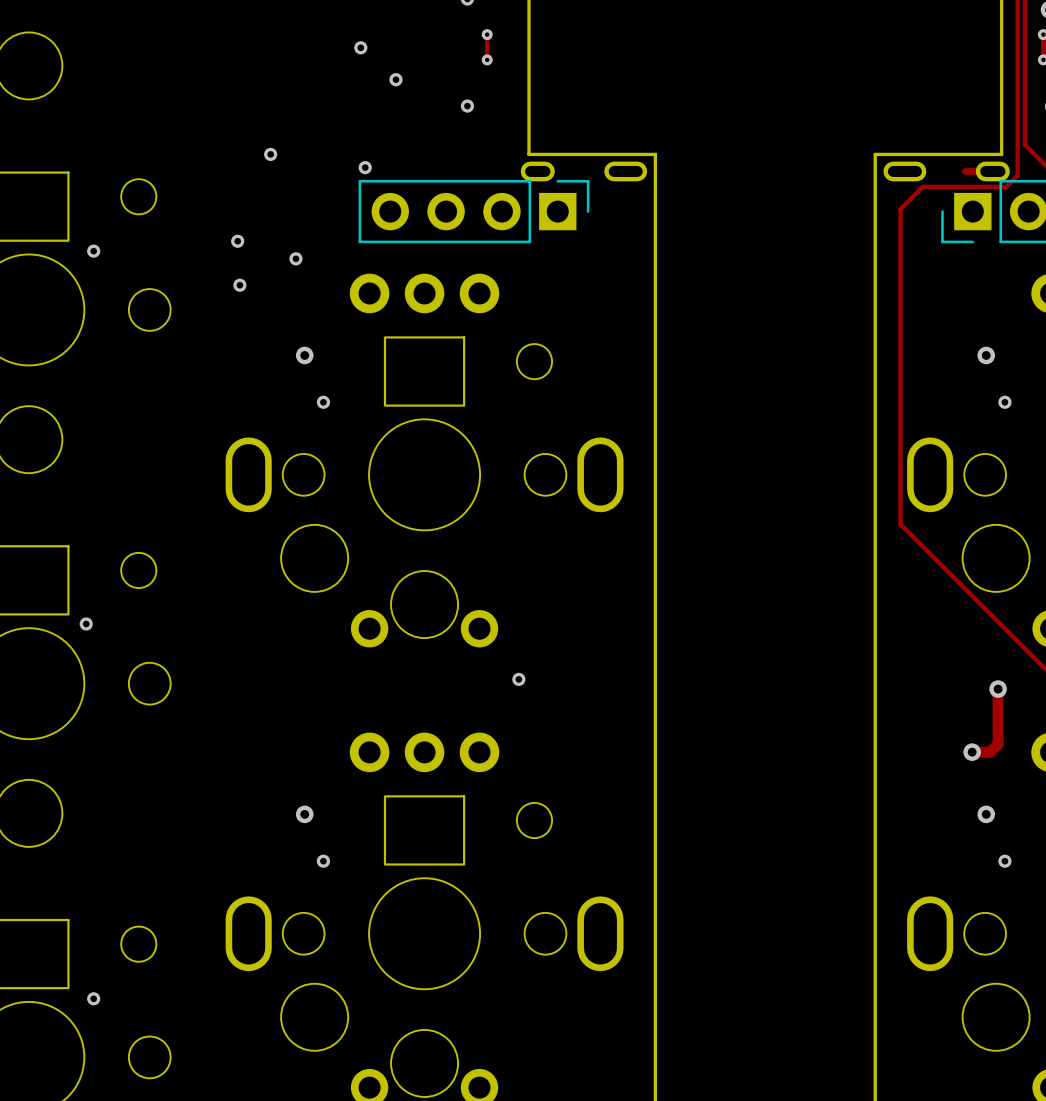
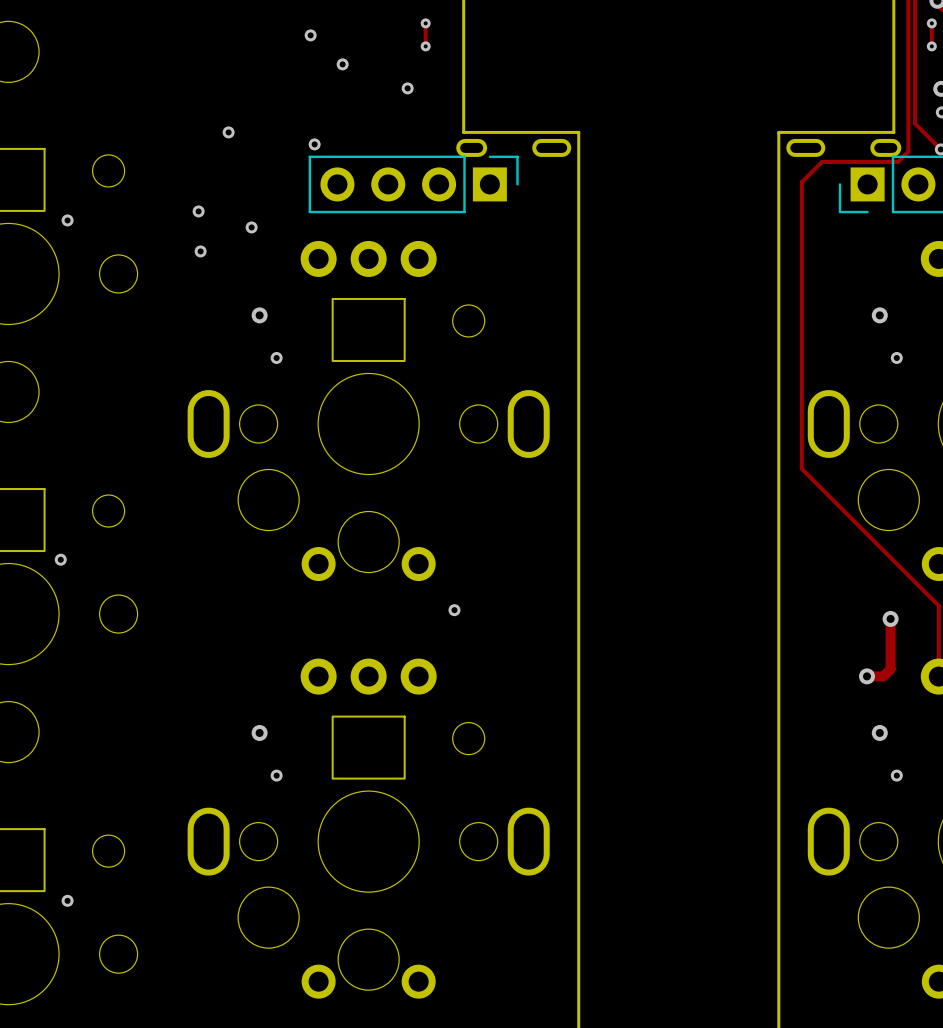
track: (965, 171) (992, 171) -> none

